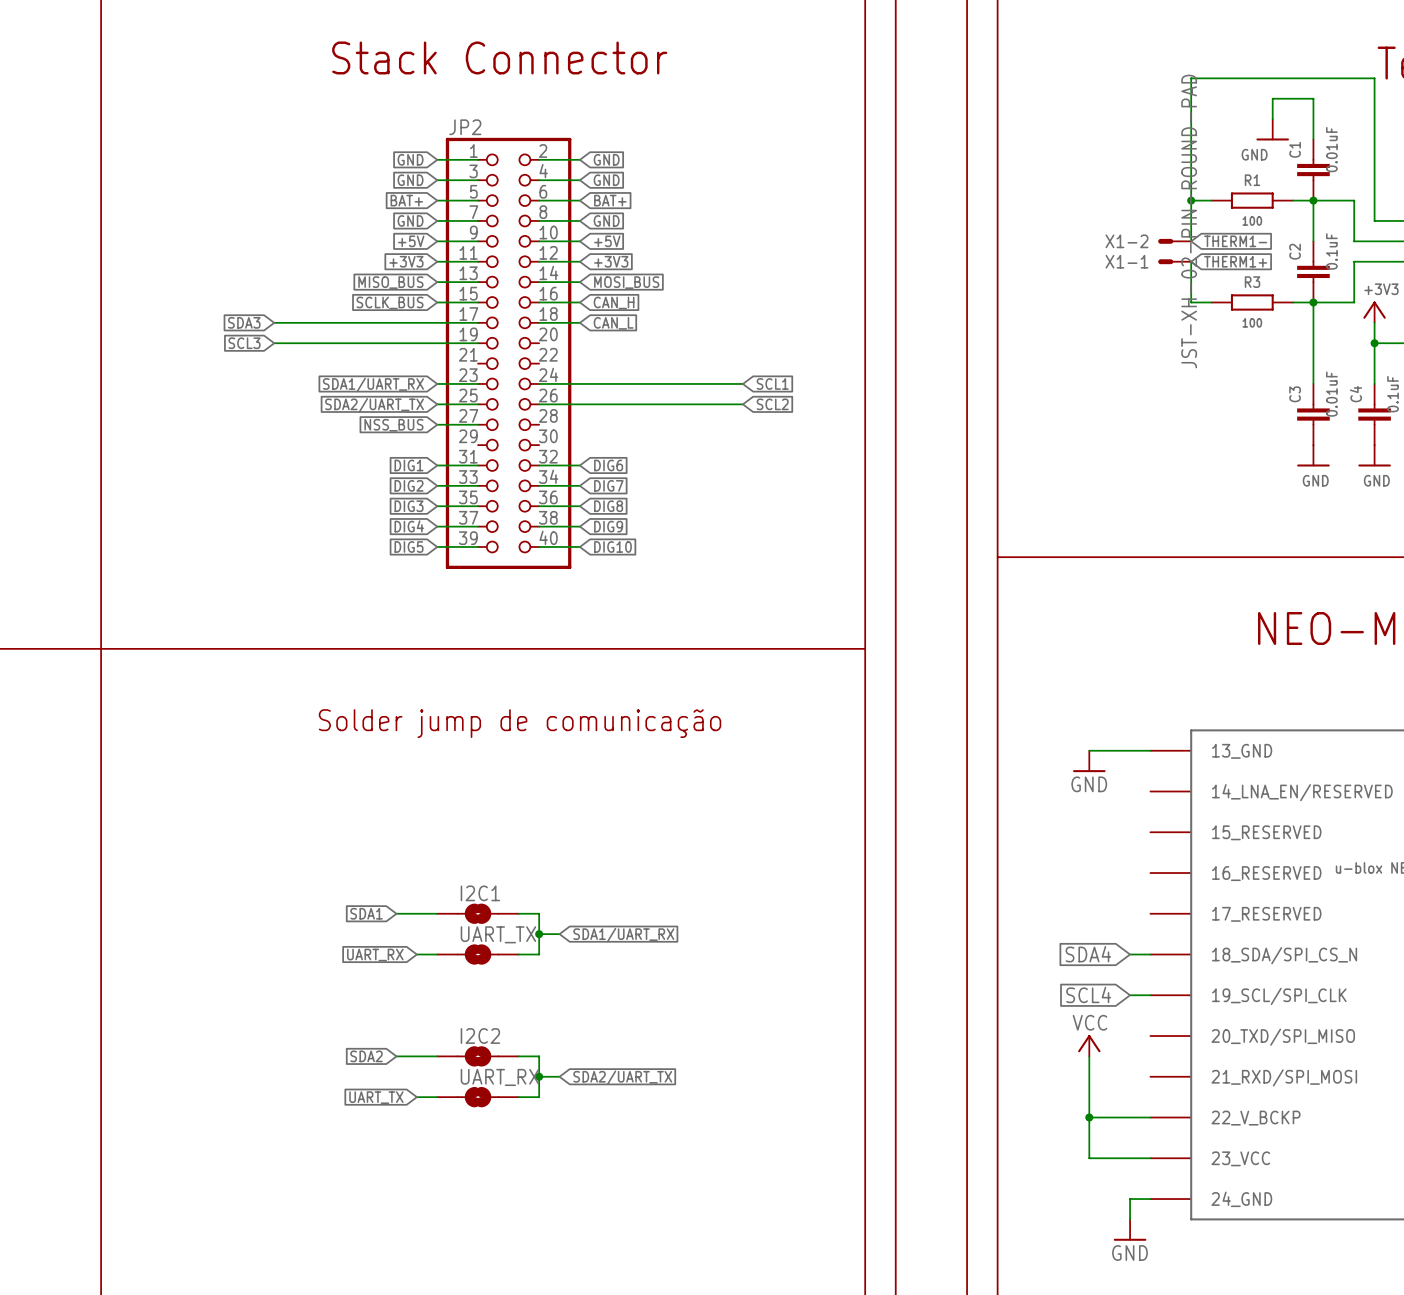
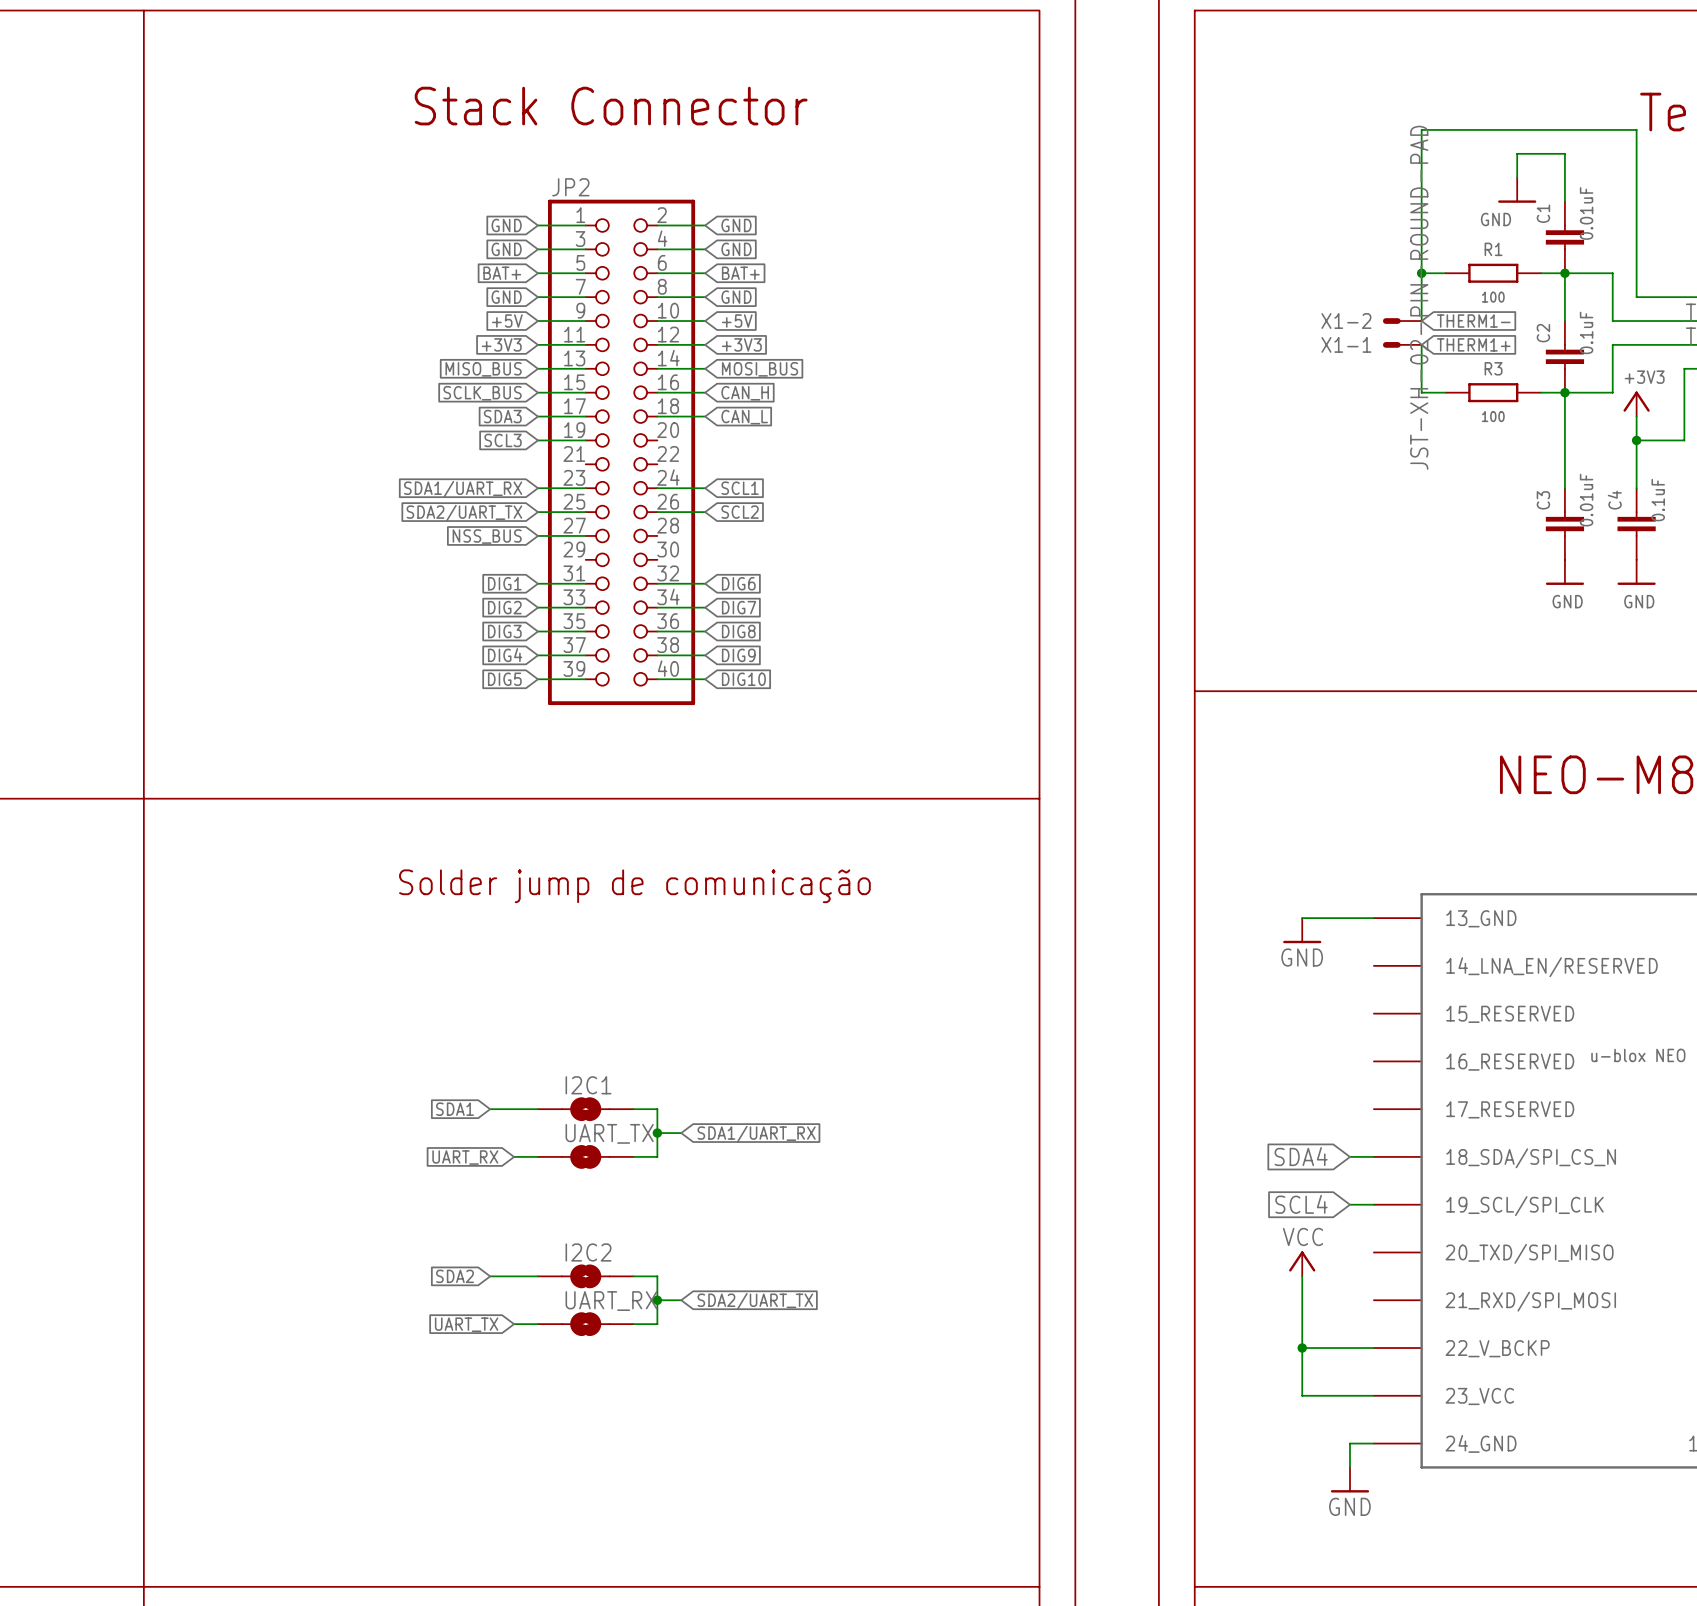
global label position: SDA3 (244, 322) -> SDA3 (502, 416)
wire: (274, 322) (437, 322) -> none
global label position: SCL3 (244, 343) -> SCL3 (503, 440)
wire: (274, 343) (437, 343) -> none
wire: (579, 383) (742, 383) -> none
global label position: SCL1 (772, 383) -> SCL1 (740, 488)
wire: (579, 404) (742, 404) -> none
global label position: SCL2 (772, 404) -> SCL2 (740, 512)

